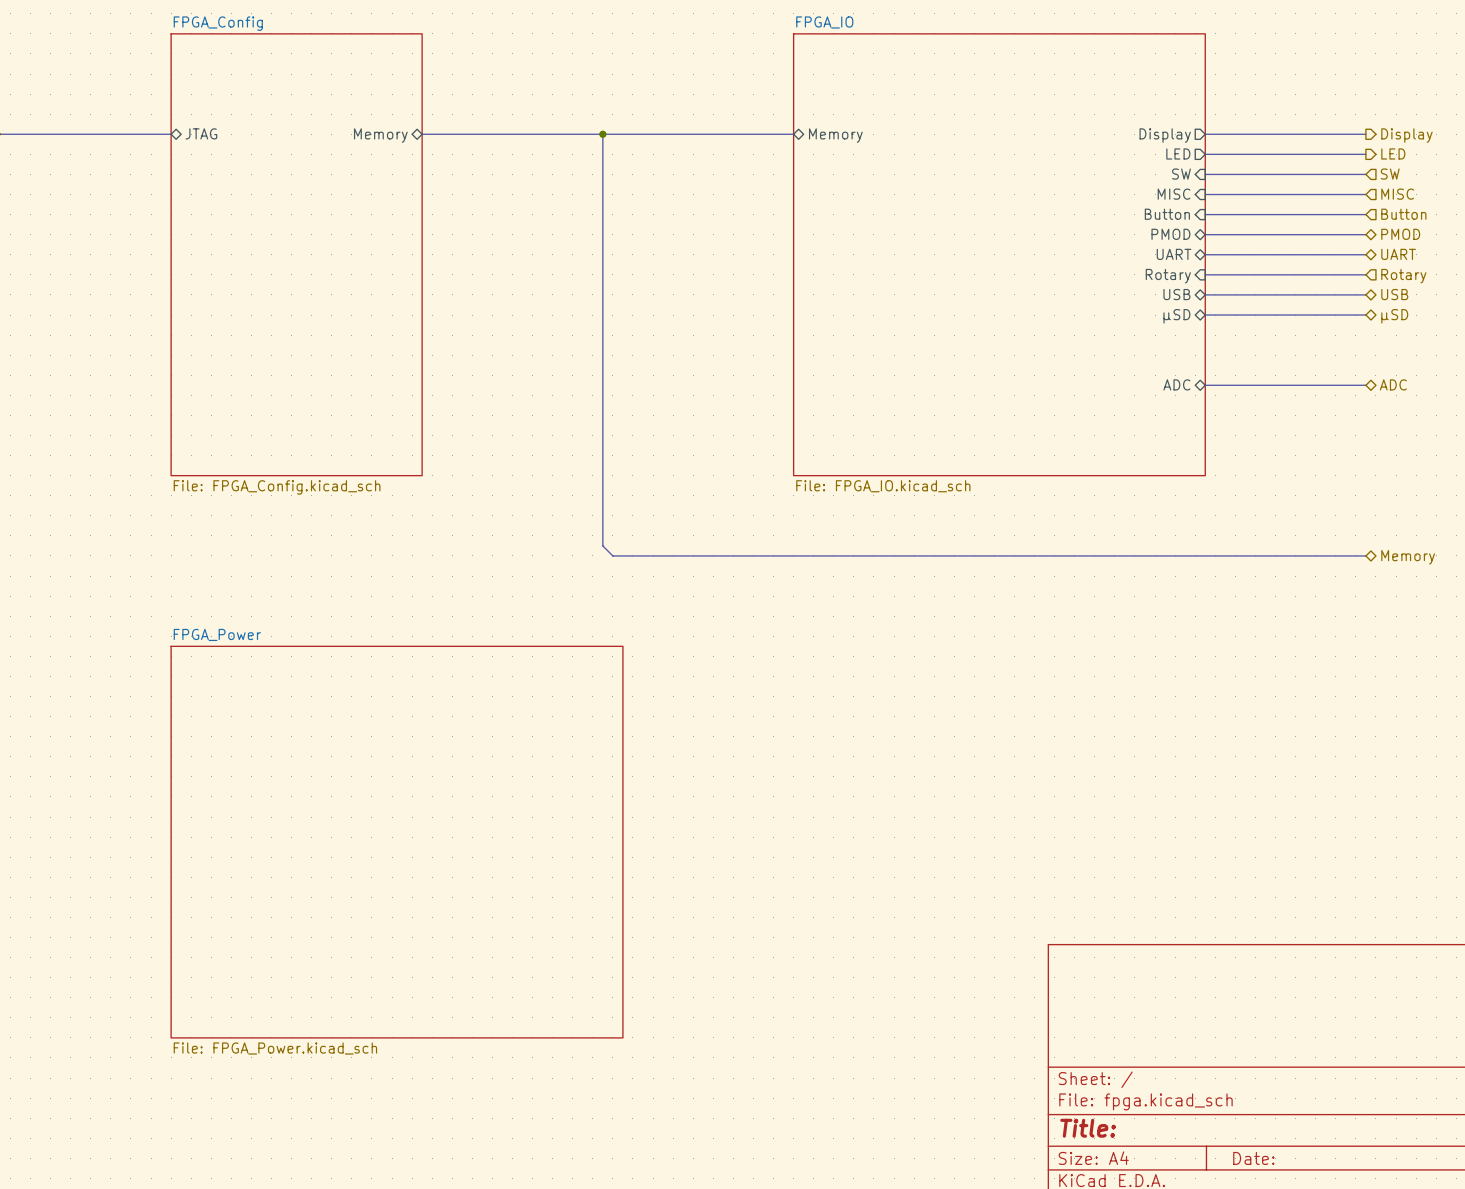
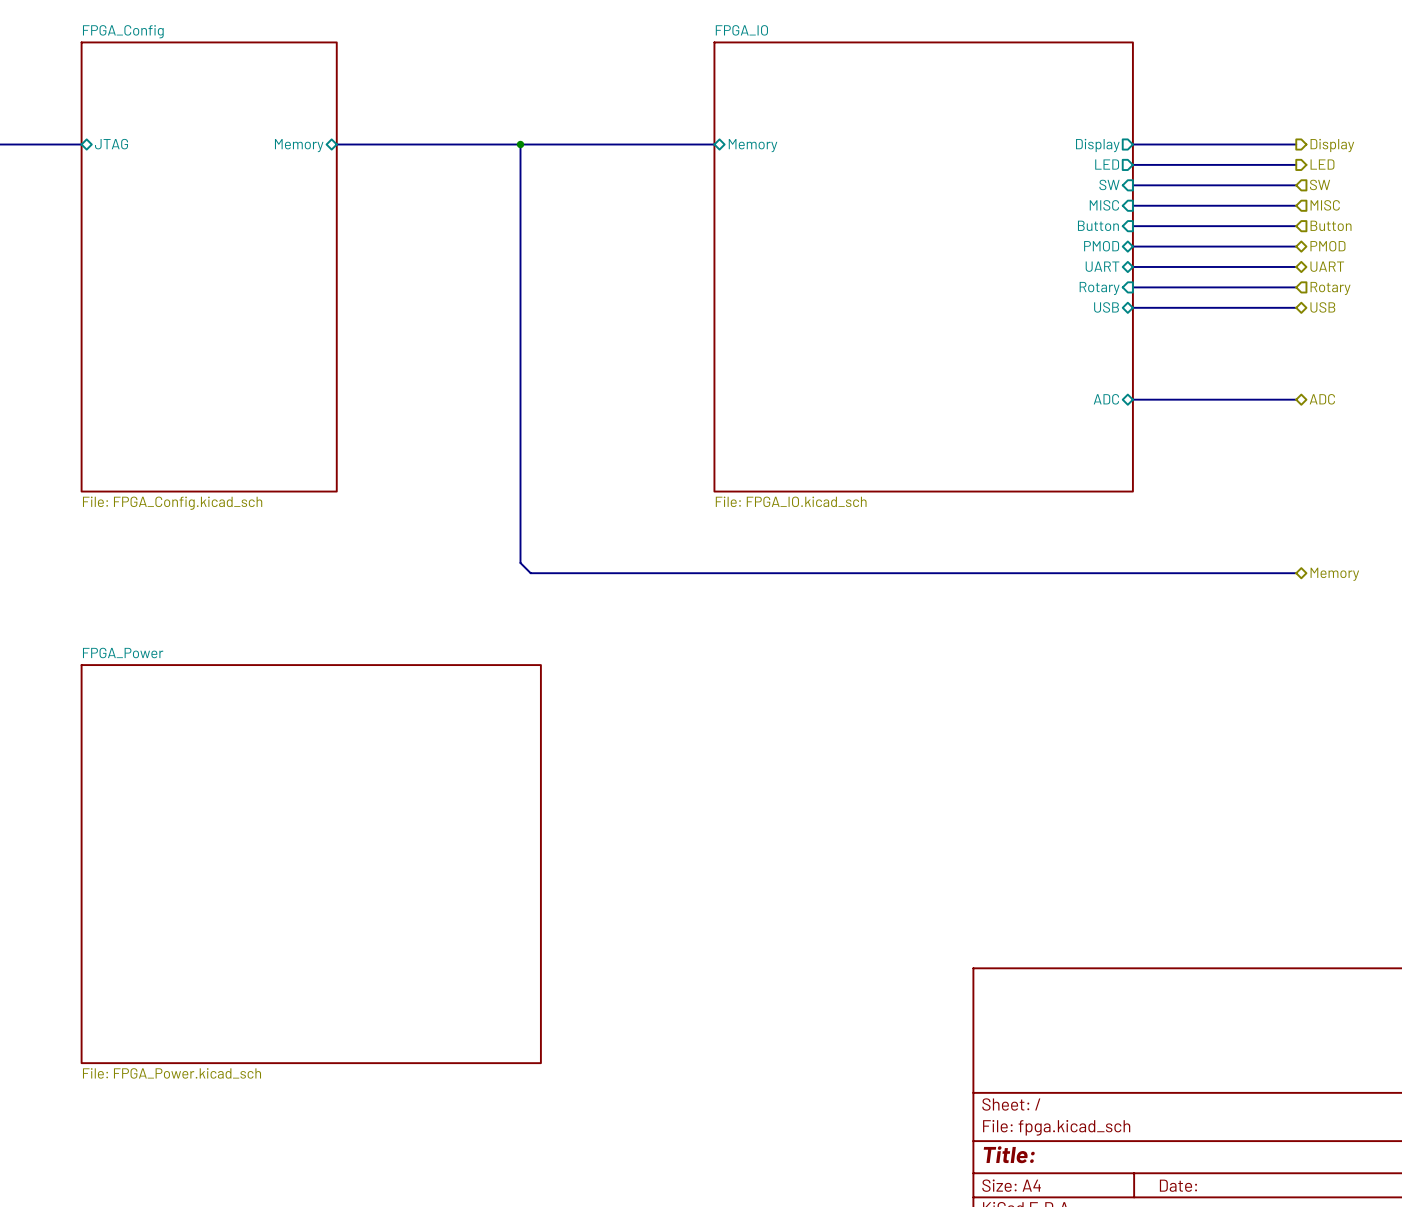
bus: (1205, 315) (1365, 315) -> none
sheet pin: μSD (1176, 316) -> none
hierarchical label: μSD (1394, 316) -> none

